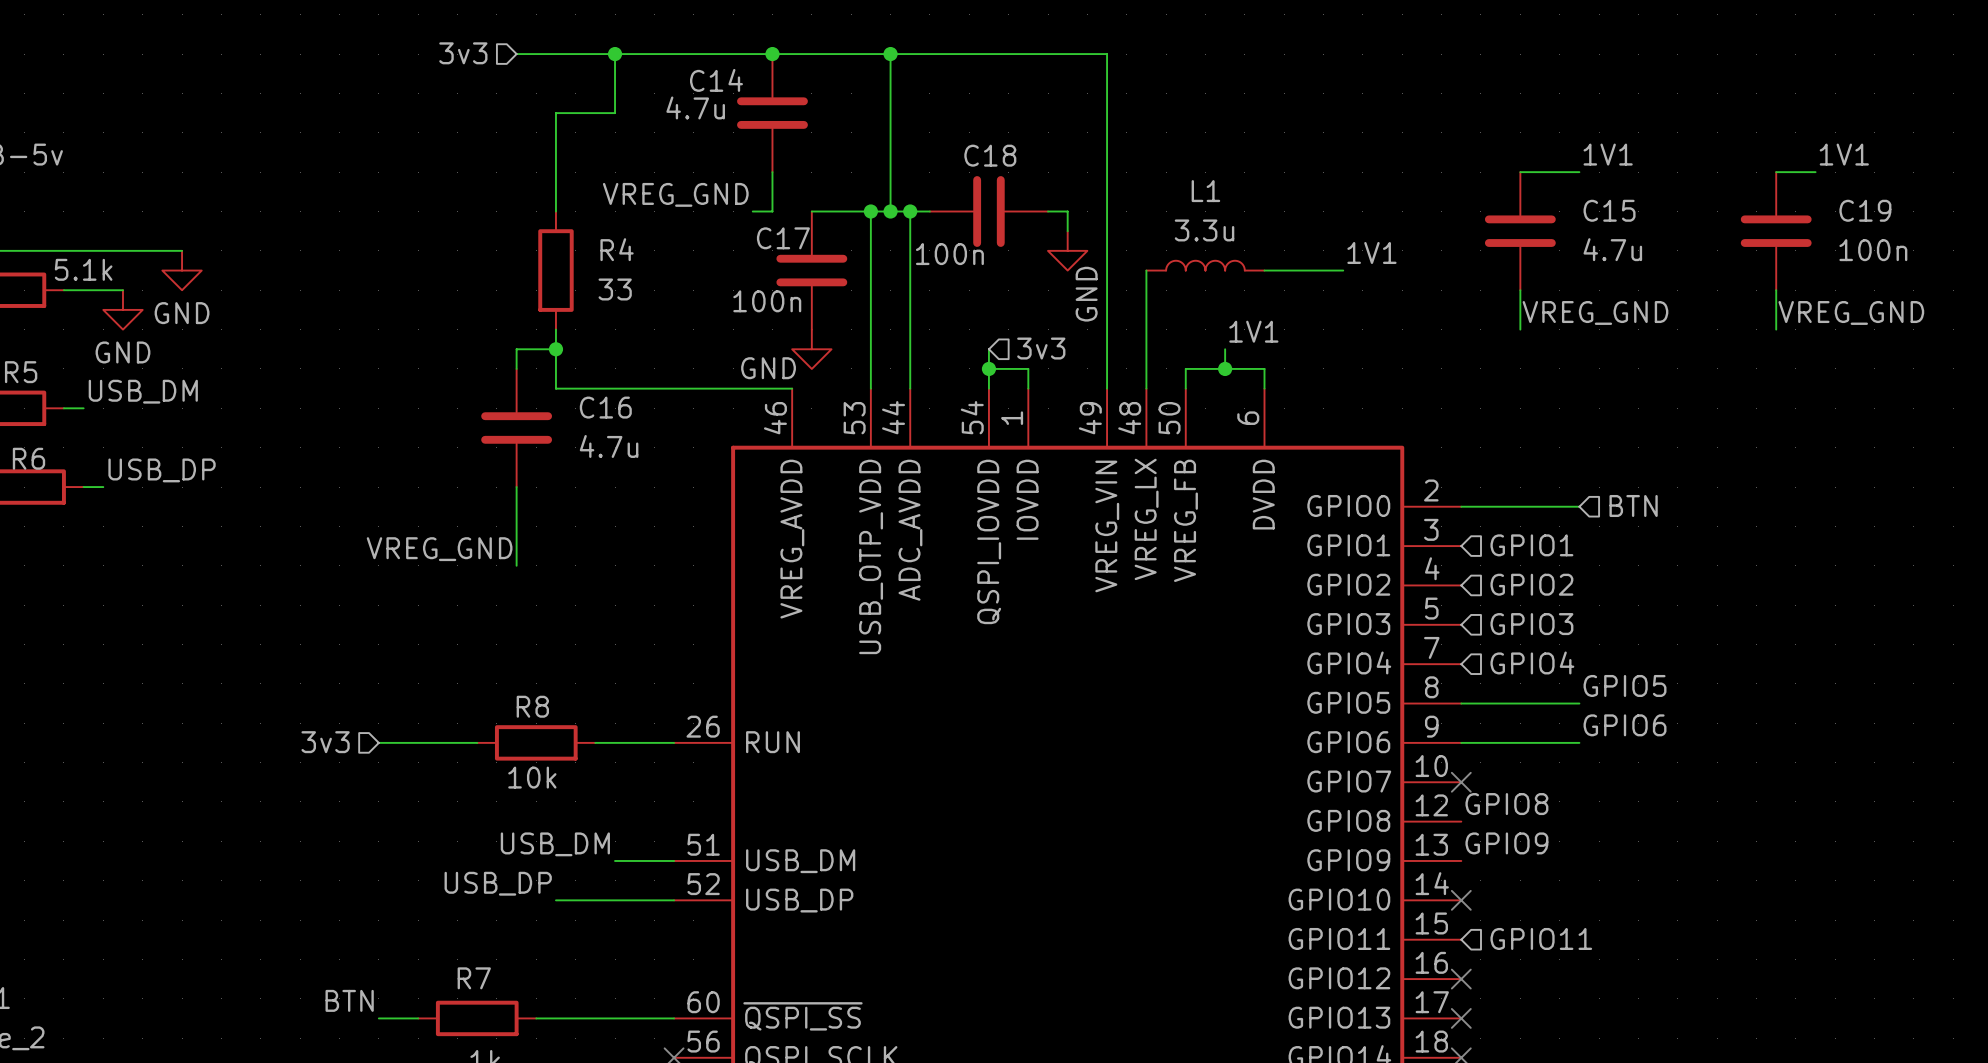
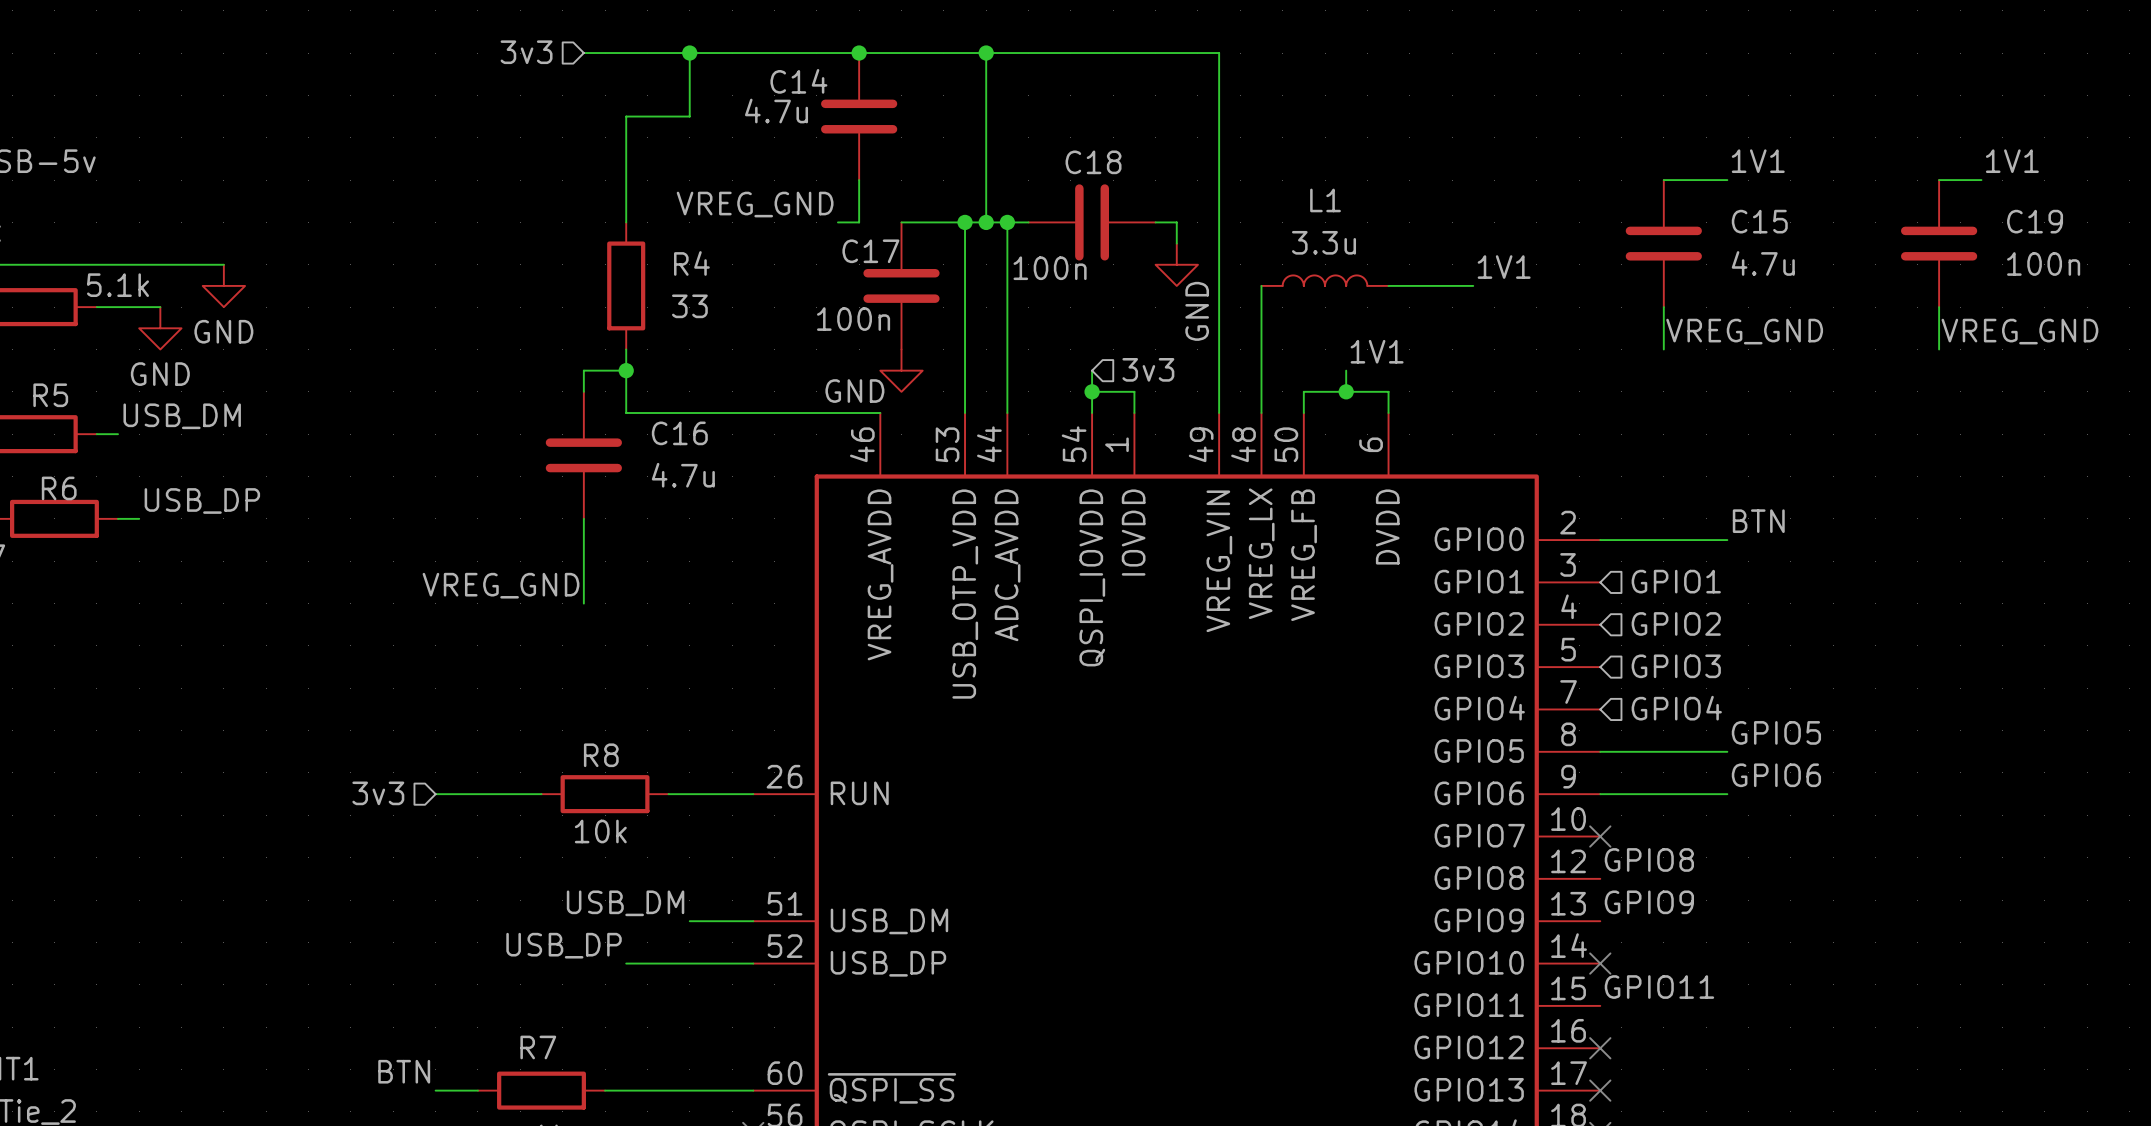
label: none -> BTN (1758, 521)
hierarchical label: BTN (1633, 505) -> none
label: none -> GPIO11 (1659, 987)
hierarchical label: GPIO11 (1541, 938) -> none

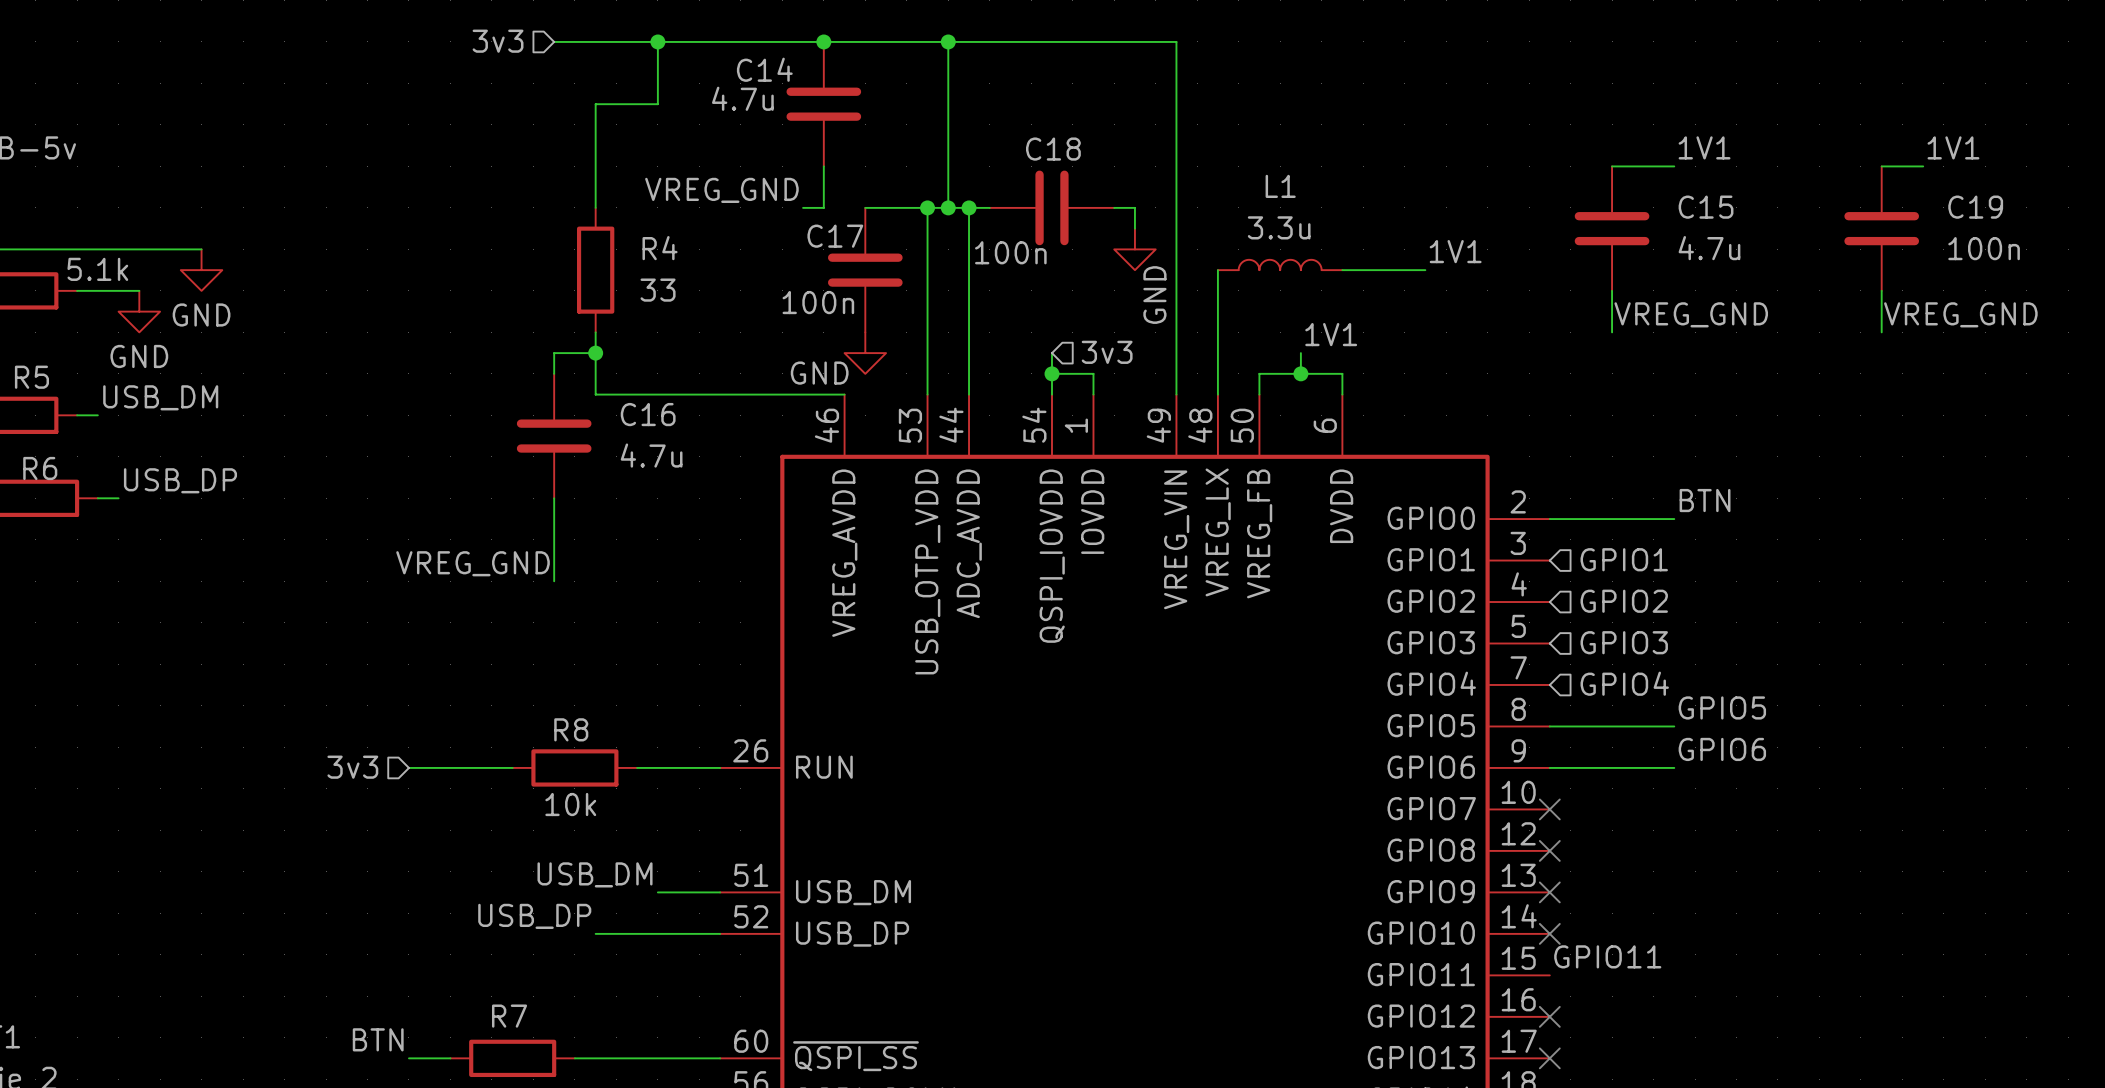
label: GPIO8 (1649, 859) -> none
no-connect mark: none -> (1549, 850)
label: GPIO9 (1649, 902) -> none
no-connect mark: none -> (1549, 892)

